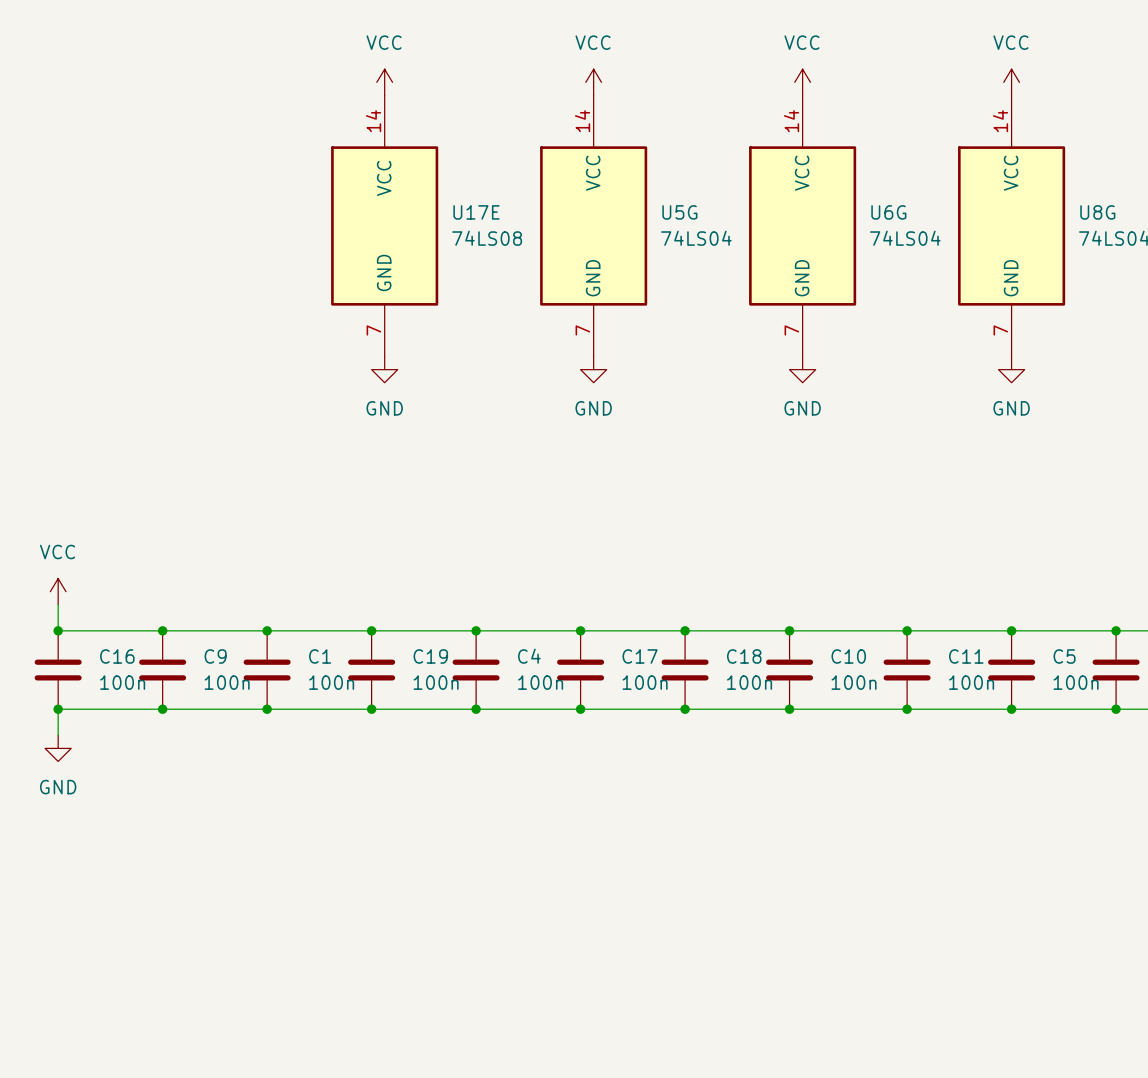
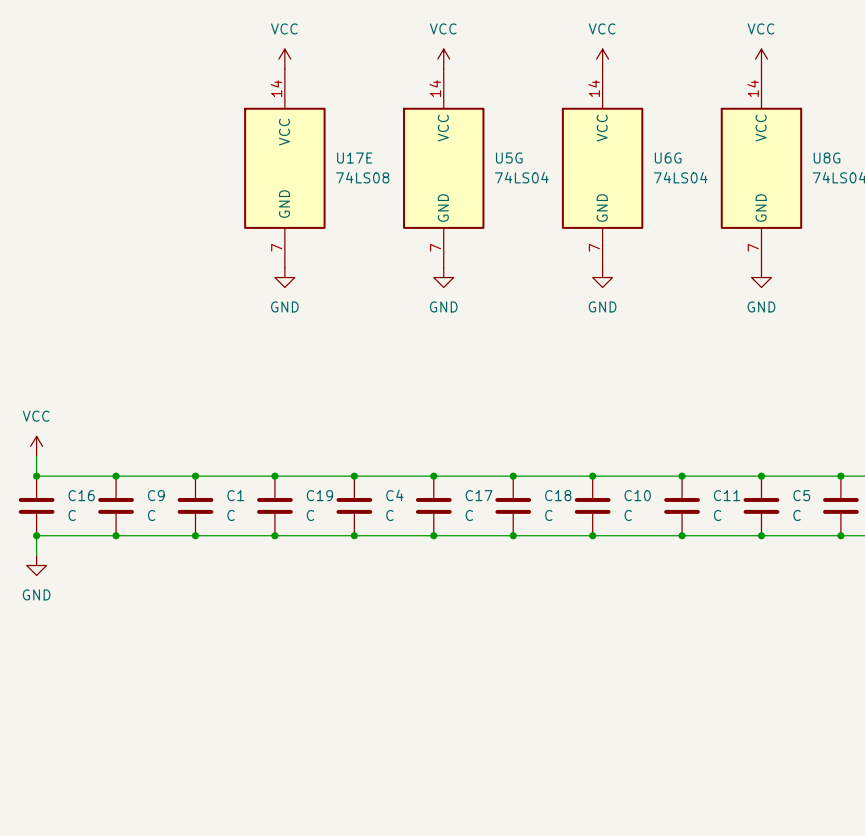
C16 value: 100n (122, 682) -> C (72, 515)
C9 value: 100n (227, 682) -> C (151, 515)
C1 value: 100n (331, 682) -> C (231, 515)
C19 value: 100n (436, 682) -> C (310, 515)
C4 value: 100n (540, 682) -> C (389, 515)
C17 value: 100n (645, 682) -> C (469, 515)
C18 value: 100n (749, 682) -> C (548, 515)
C10 value: 100n (854, 682) -> C (628, 515)
C11 value: 100n (971, 682) -> C (717, 515)
C5 value: 100n (1076, 682) -> C (797, 515)

